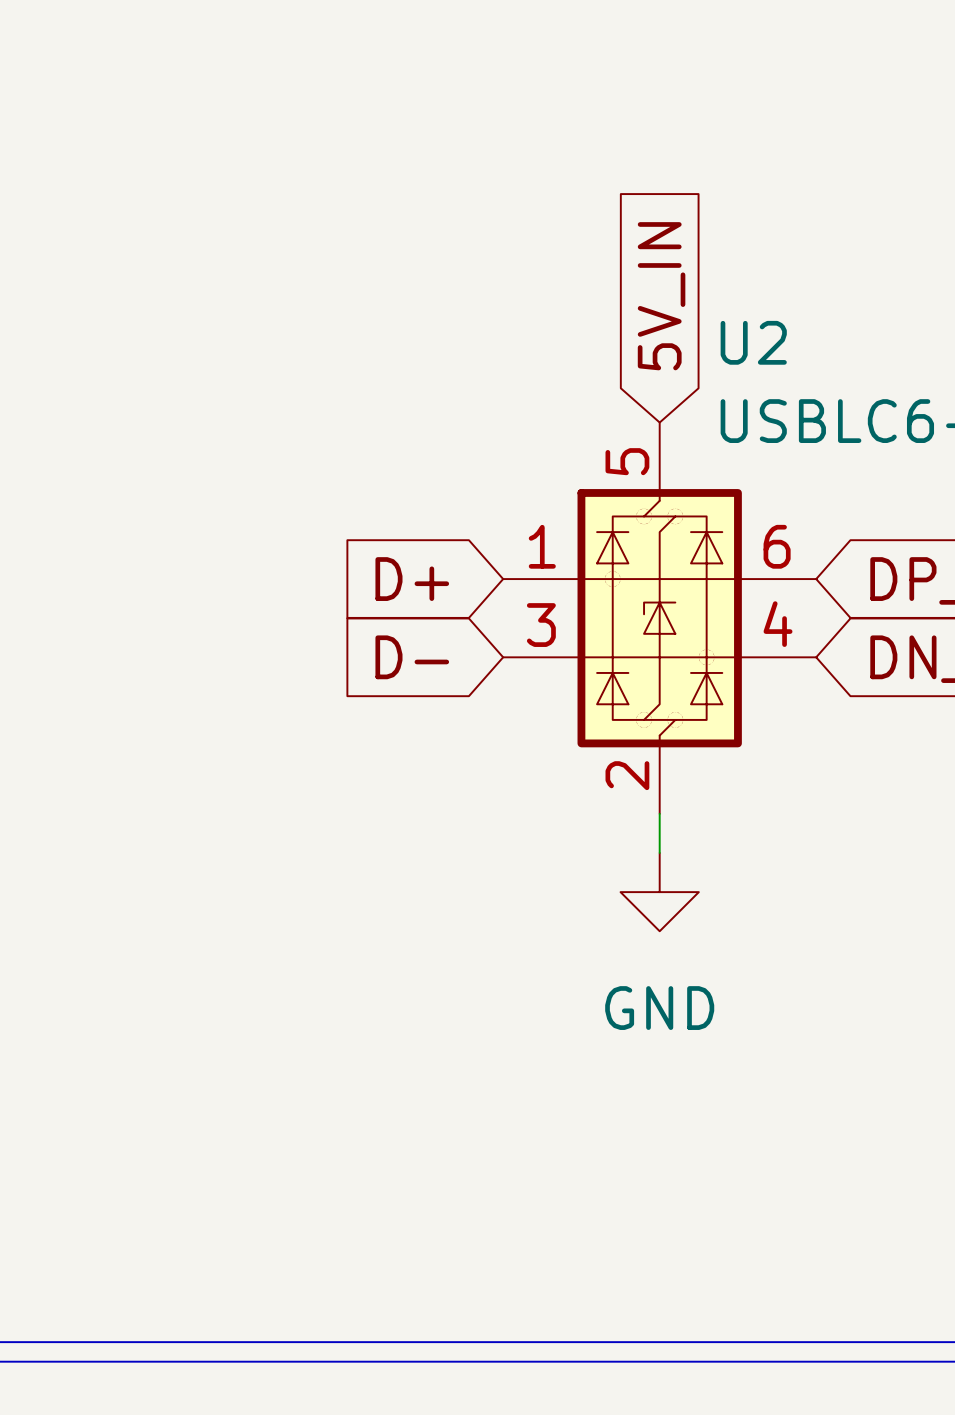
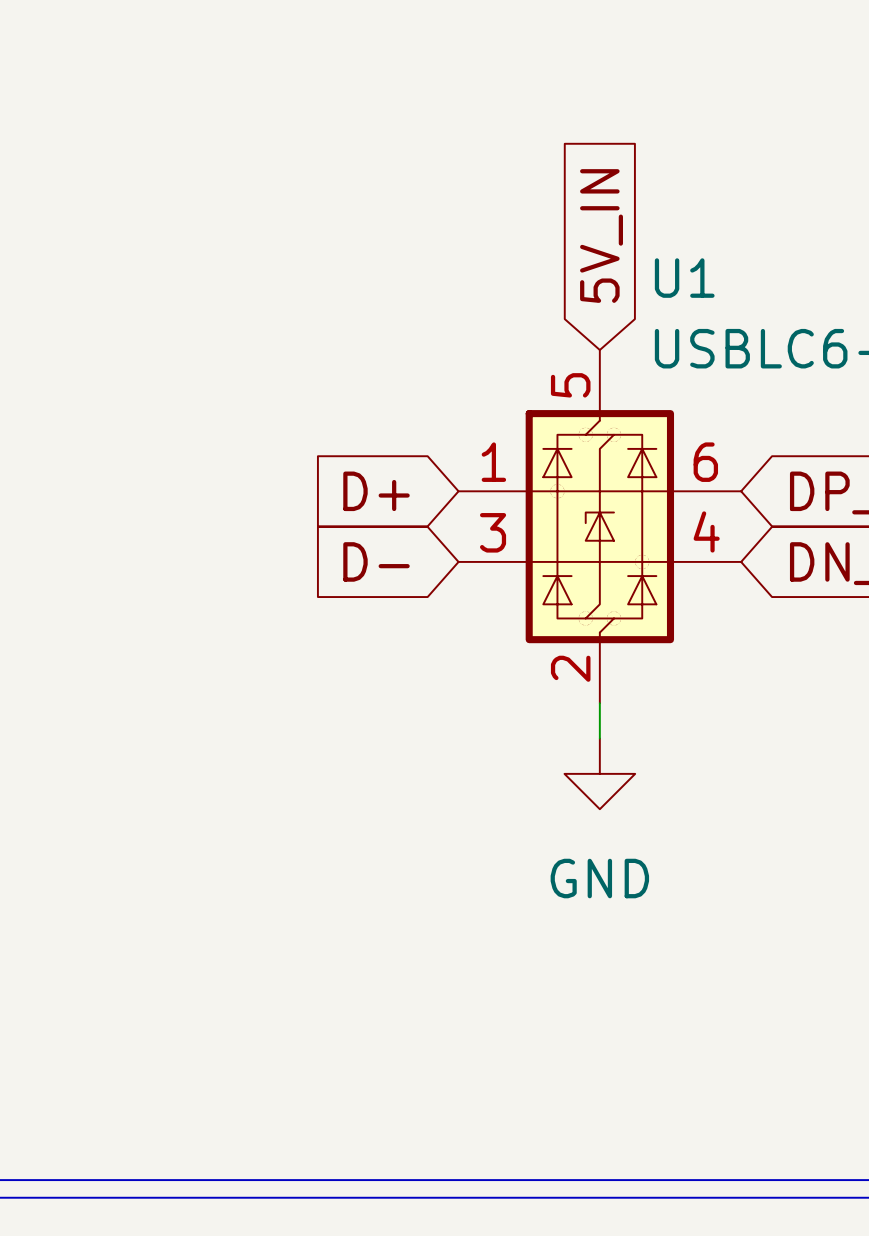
U2 name: U2 (753, 342) -> U1 (684, 278)

